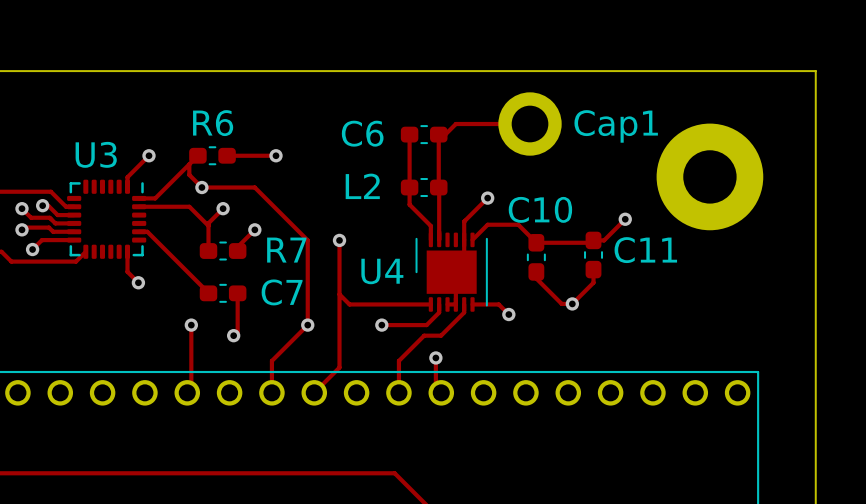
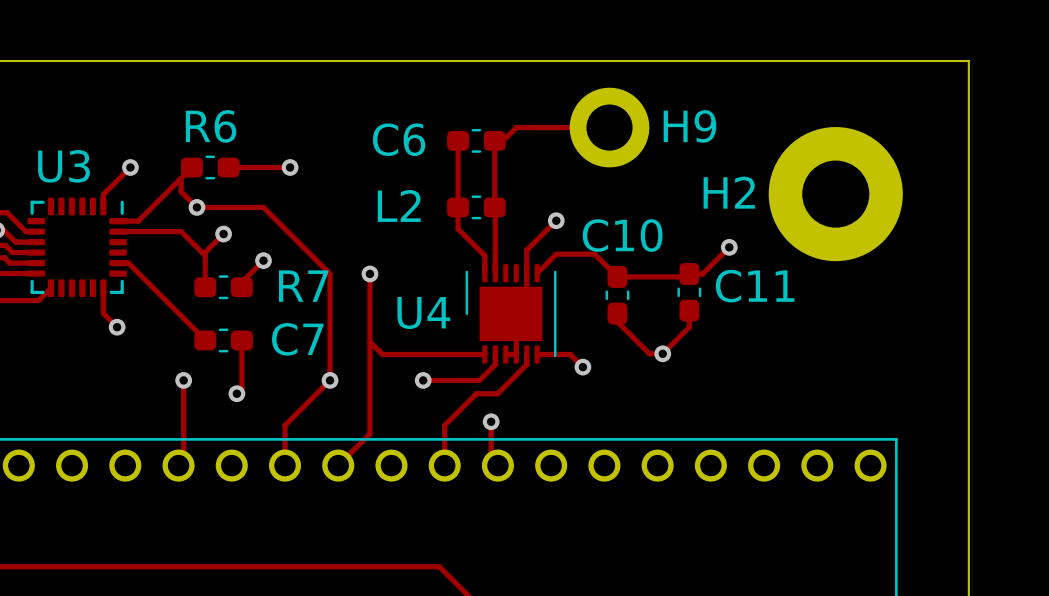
Cap1 name: Cap1 (616, 126) -> H9 (689, 126)
H2 name: none -> H2 (729, 192)

